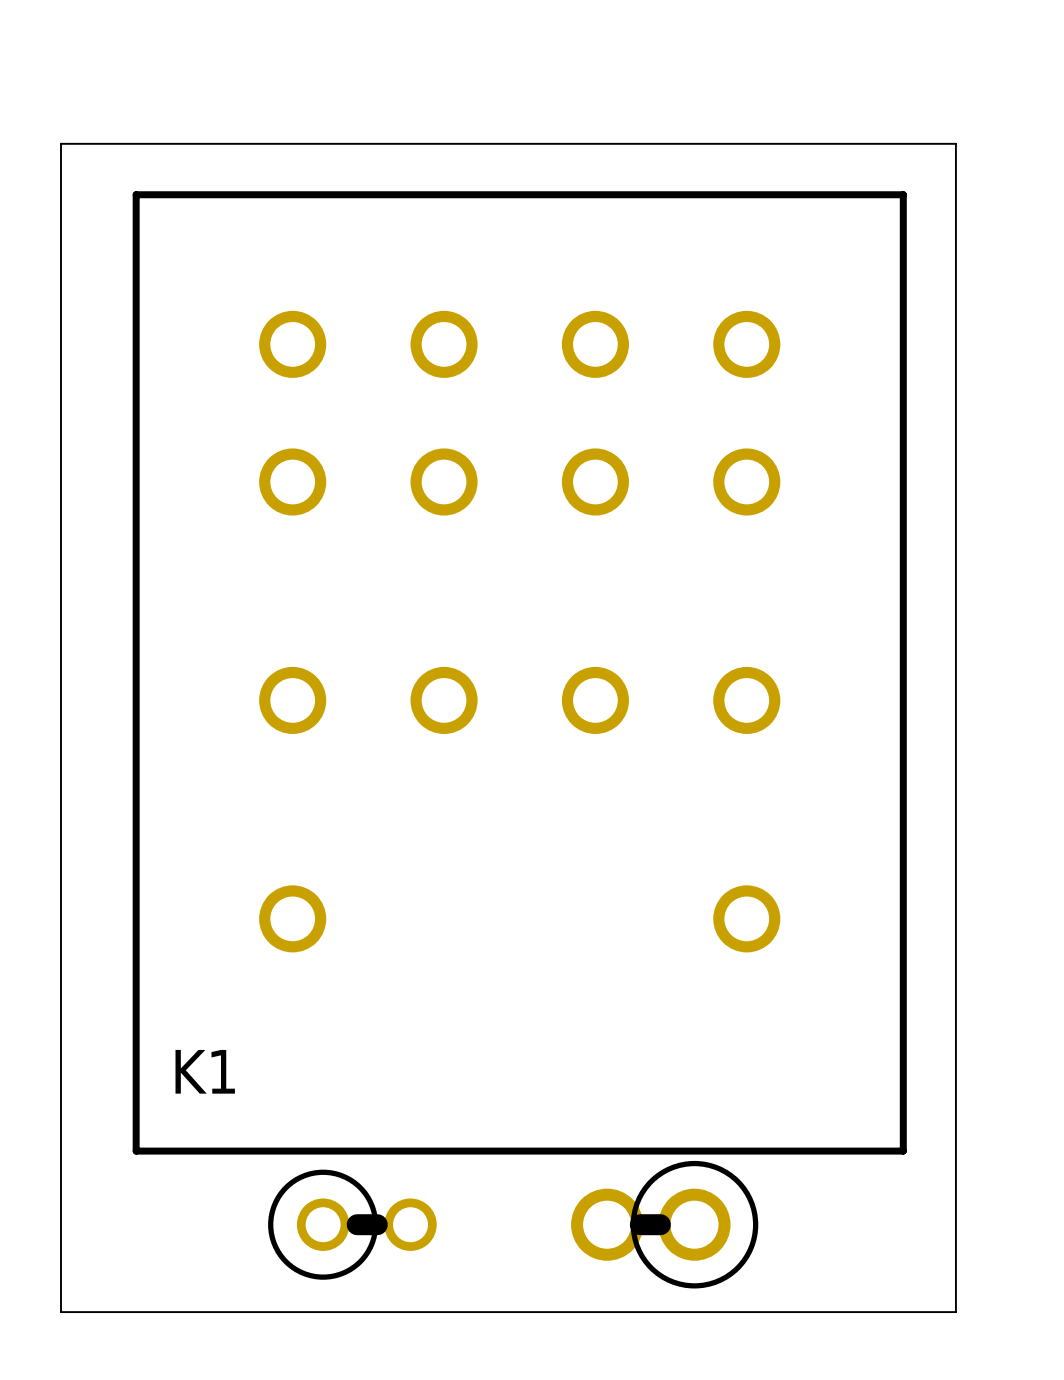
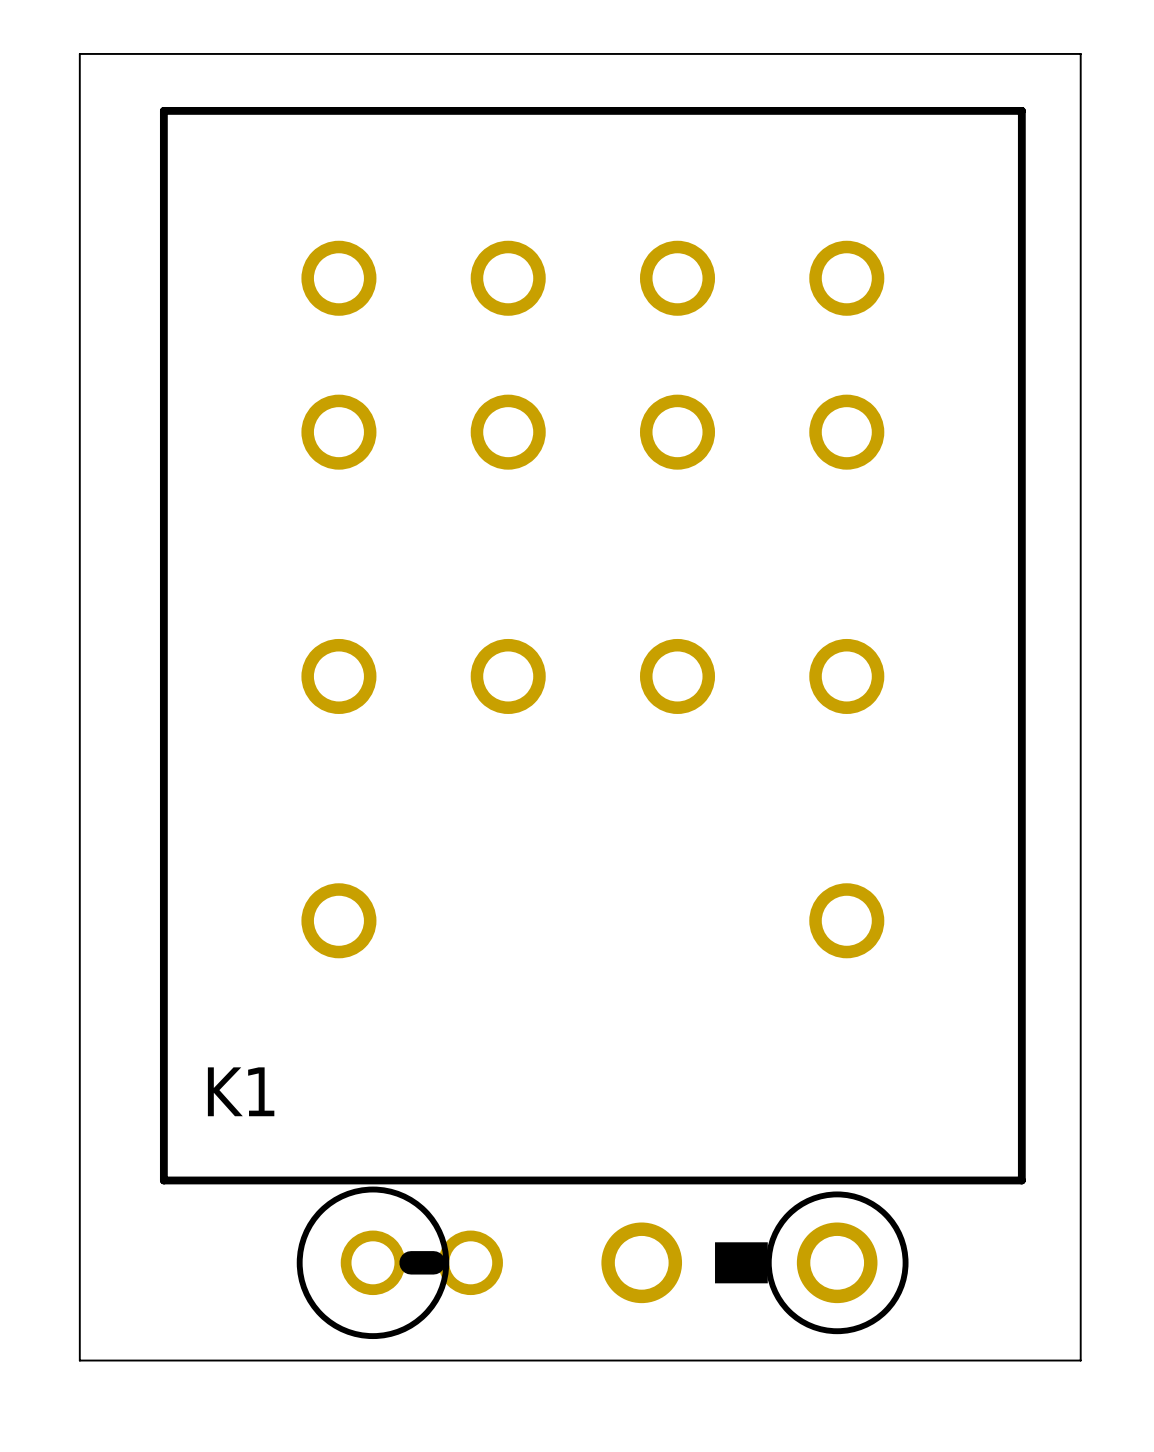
part footprint: [571, 1160, 759, 1289] -> [601, 1191, 909, 1335]
part footprint: [268, 1169, 437, 1280] -> [296, 1186, 503, 1340]

